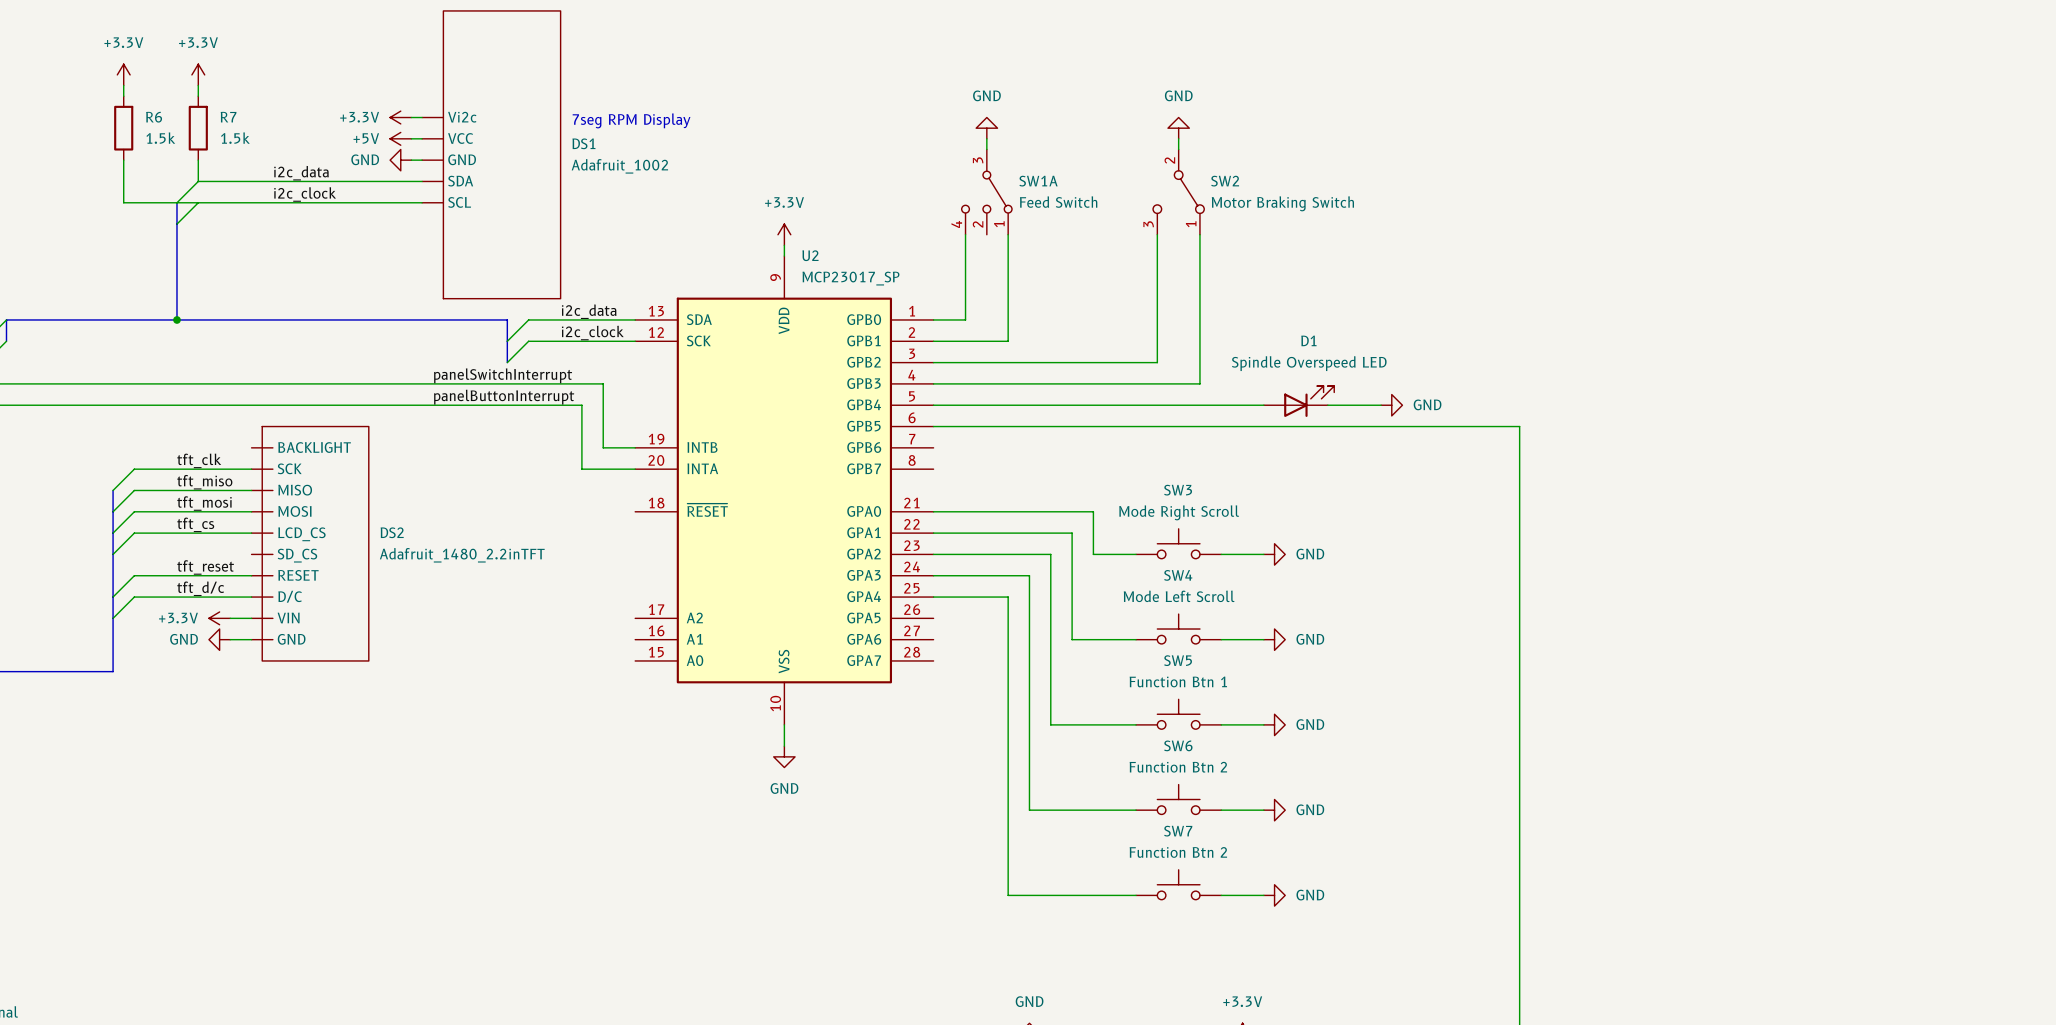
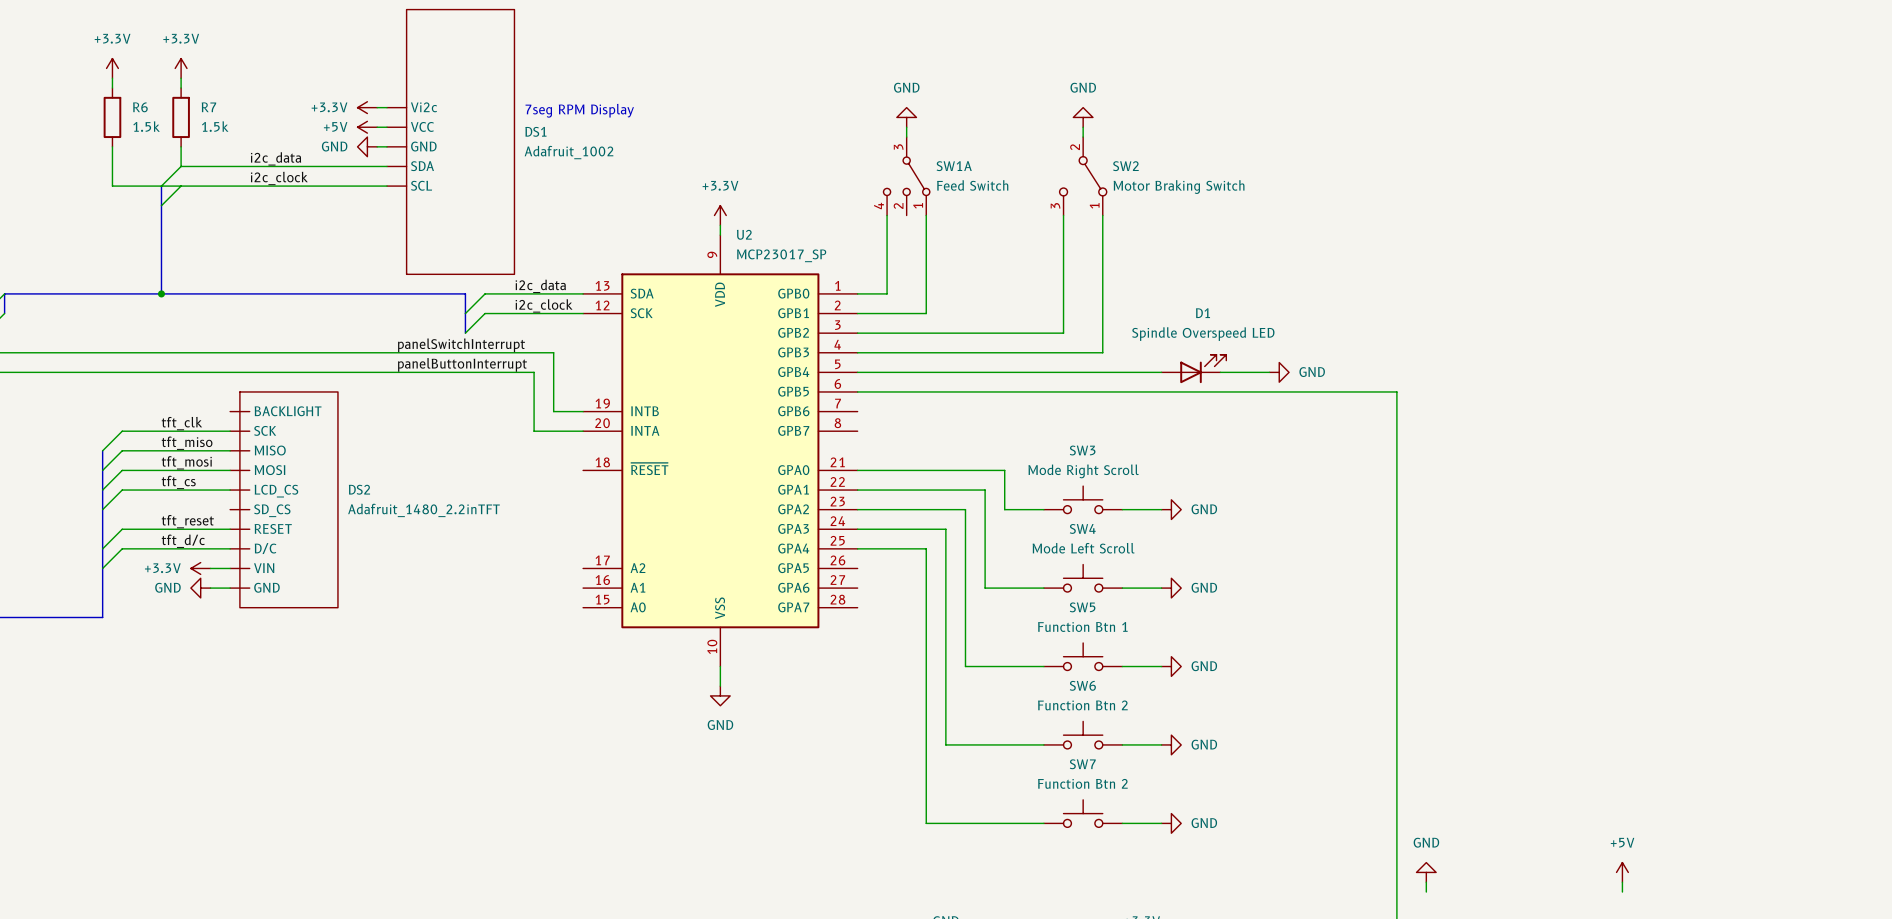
power symbol: none -> GND (1426, 872)
power symbol: none -> +5V (1622, 872)
wire: none -> (1426, 882) (1426, 892)
wire: none -> (1622, 882) (1622, 892)

